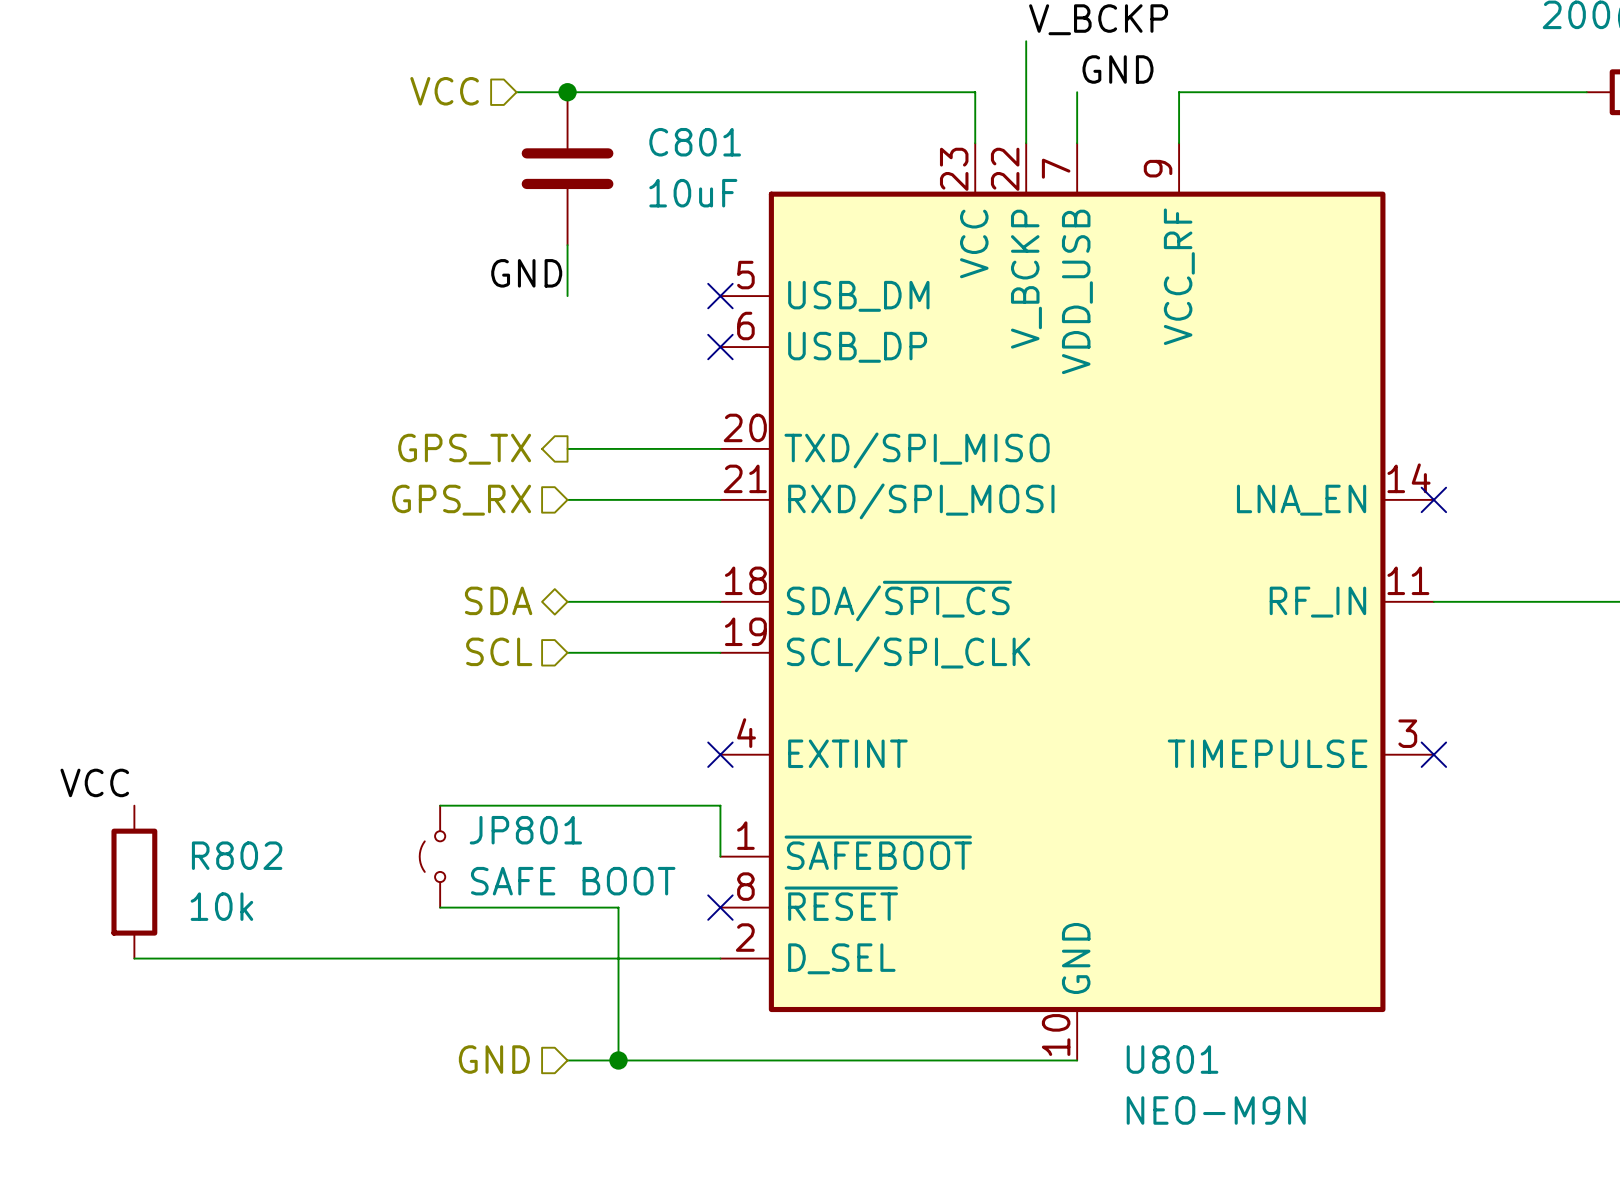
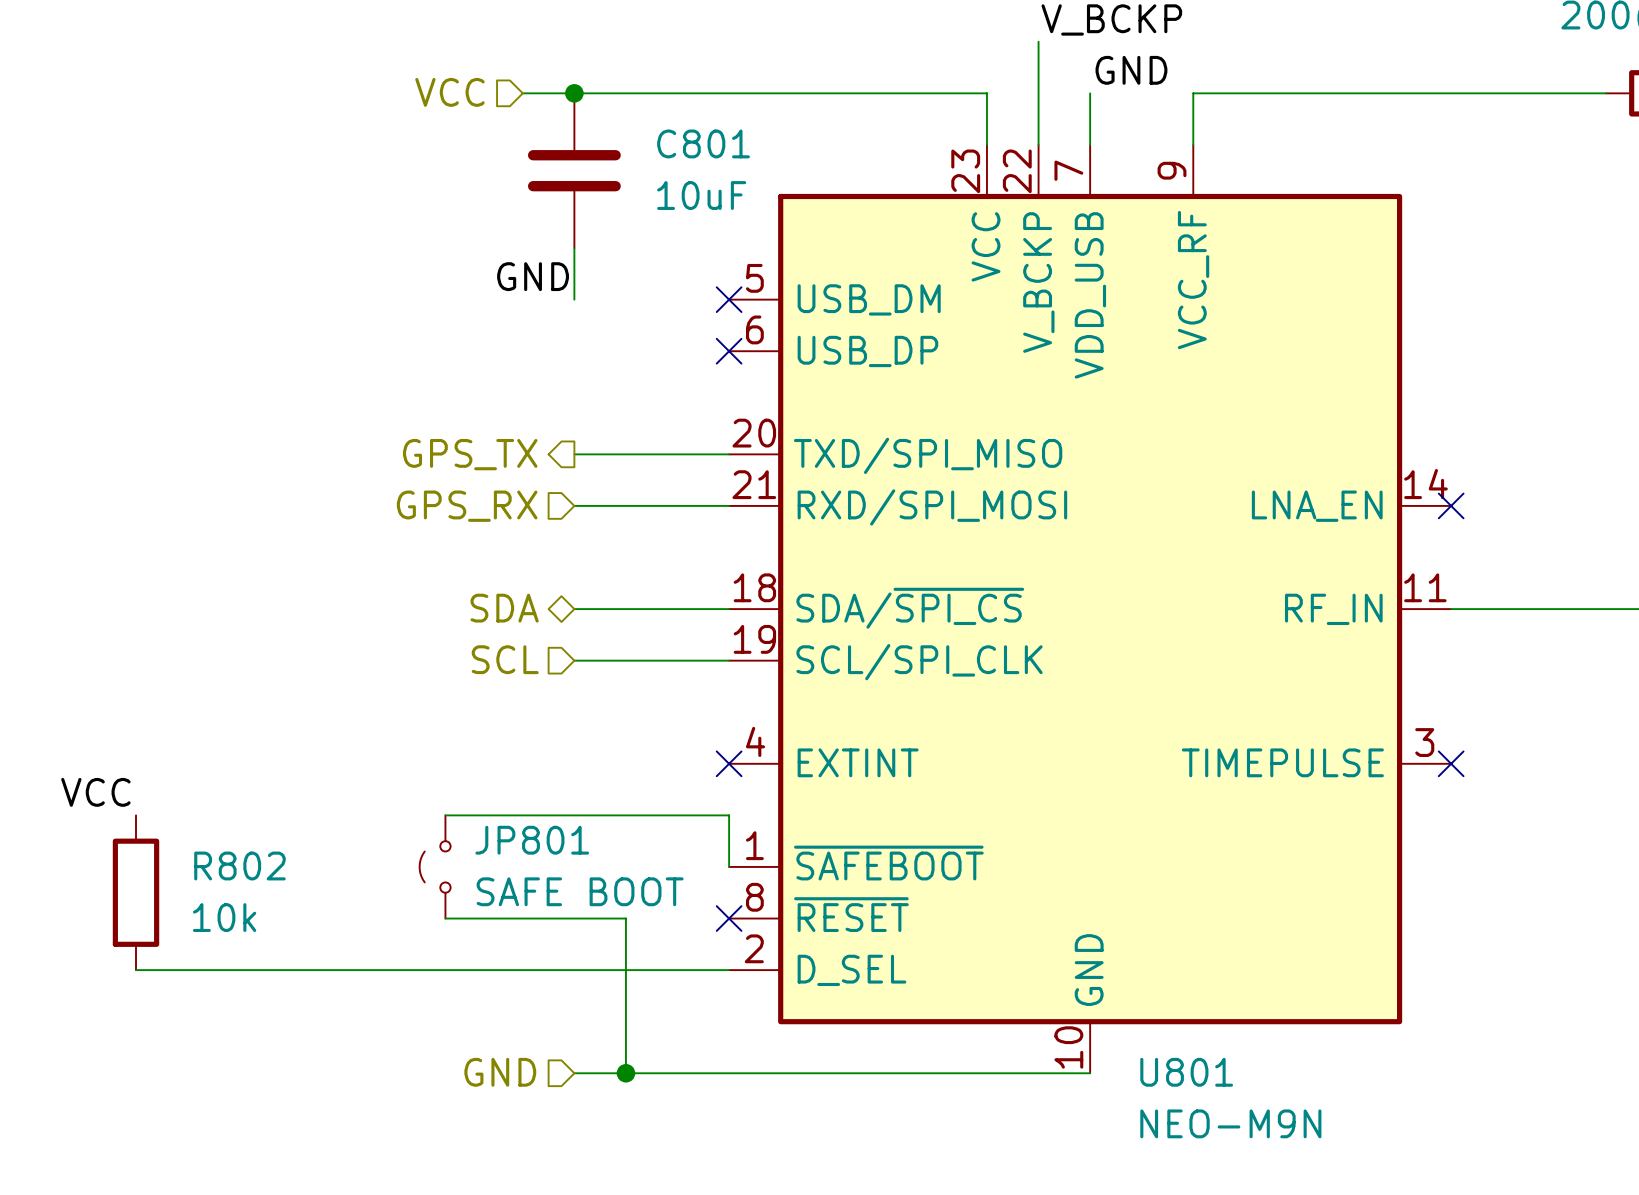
JP801 symbol: [419, 805, 446, 908] -> [419, 815, 451, 919]

